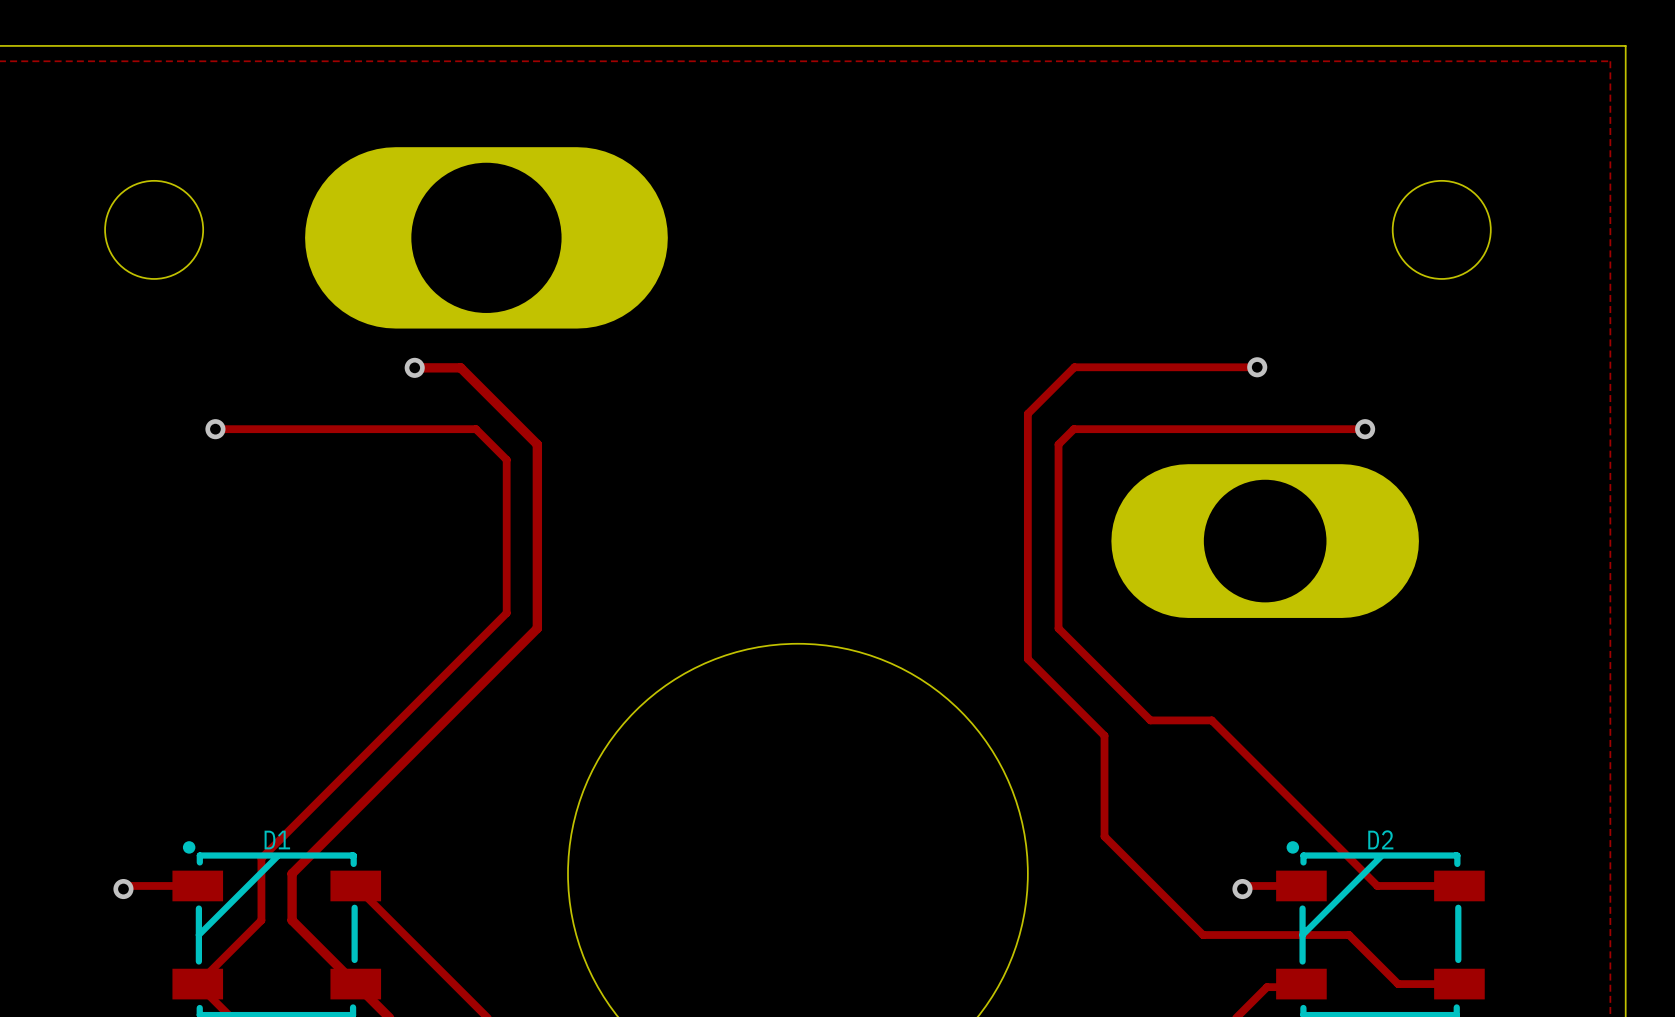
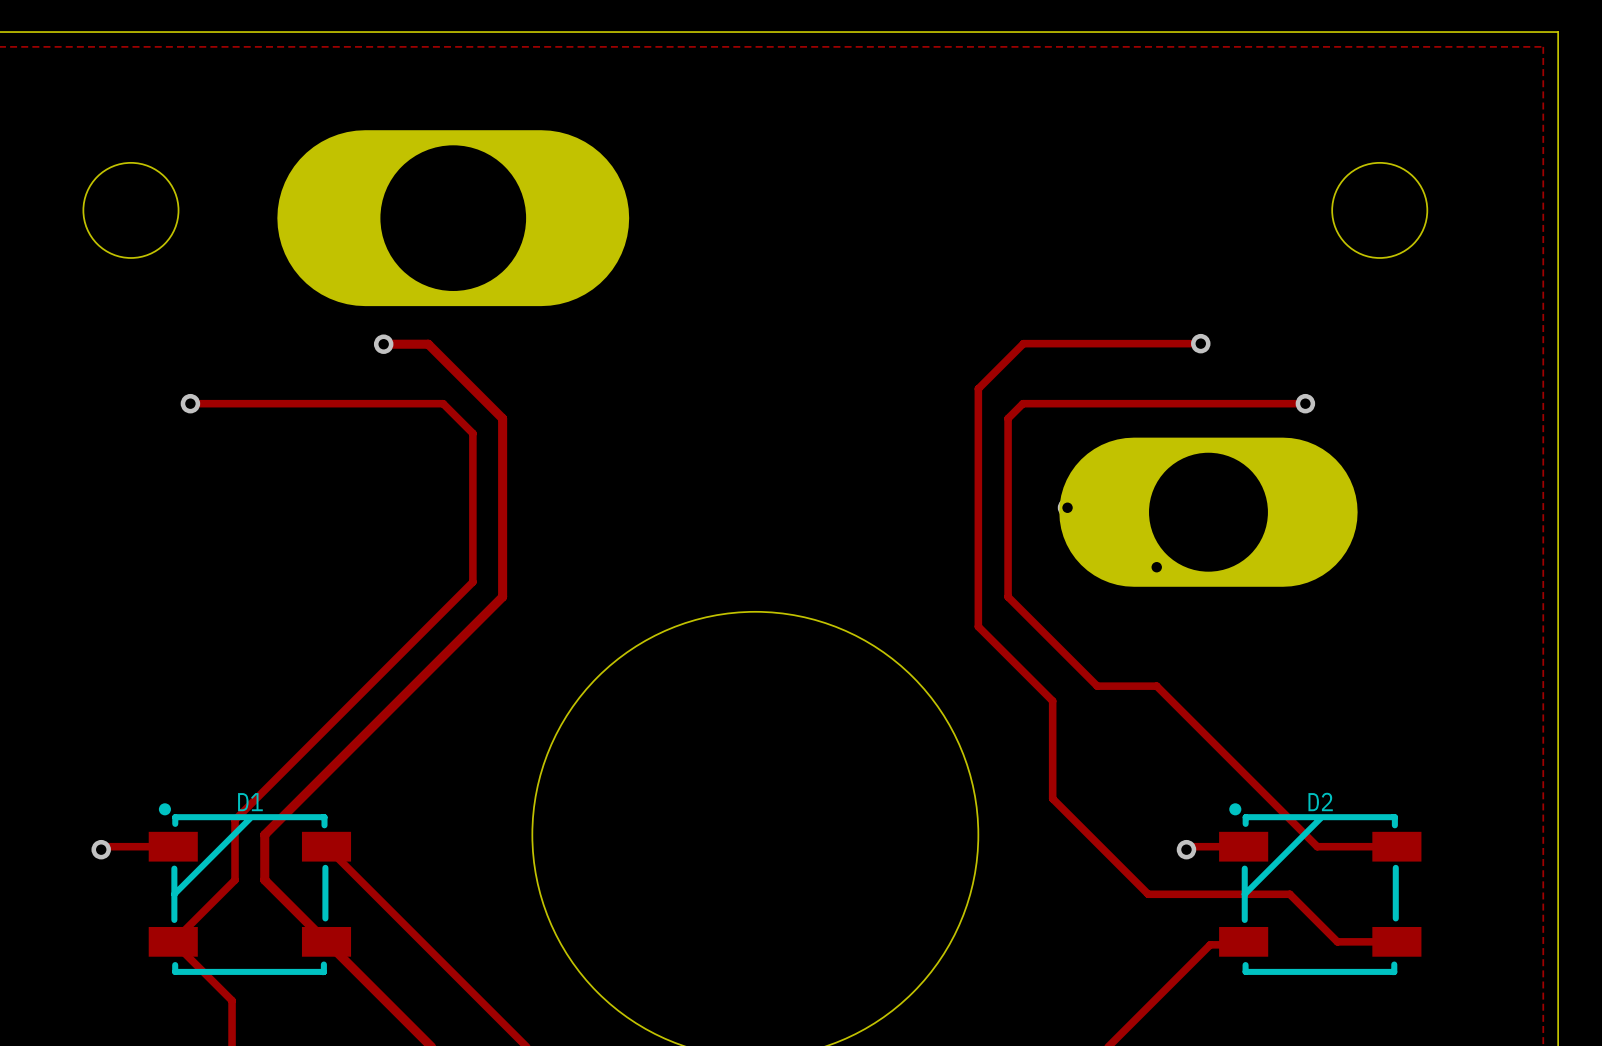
via: none -> (1067, 507)
via: none -> (1156, 567)

